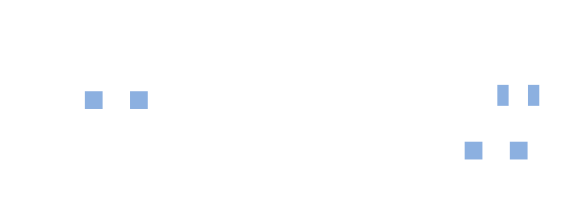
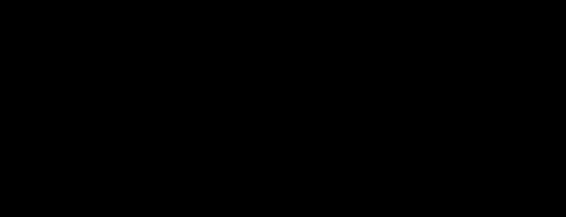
part: (518, 95) -> none
part: (116, 100) -> none
part: (496, 150) -> none

